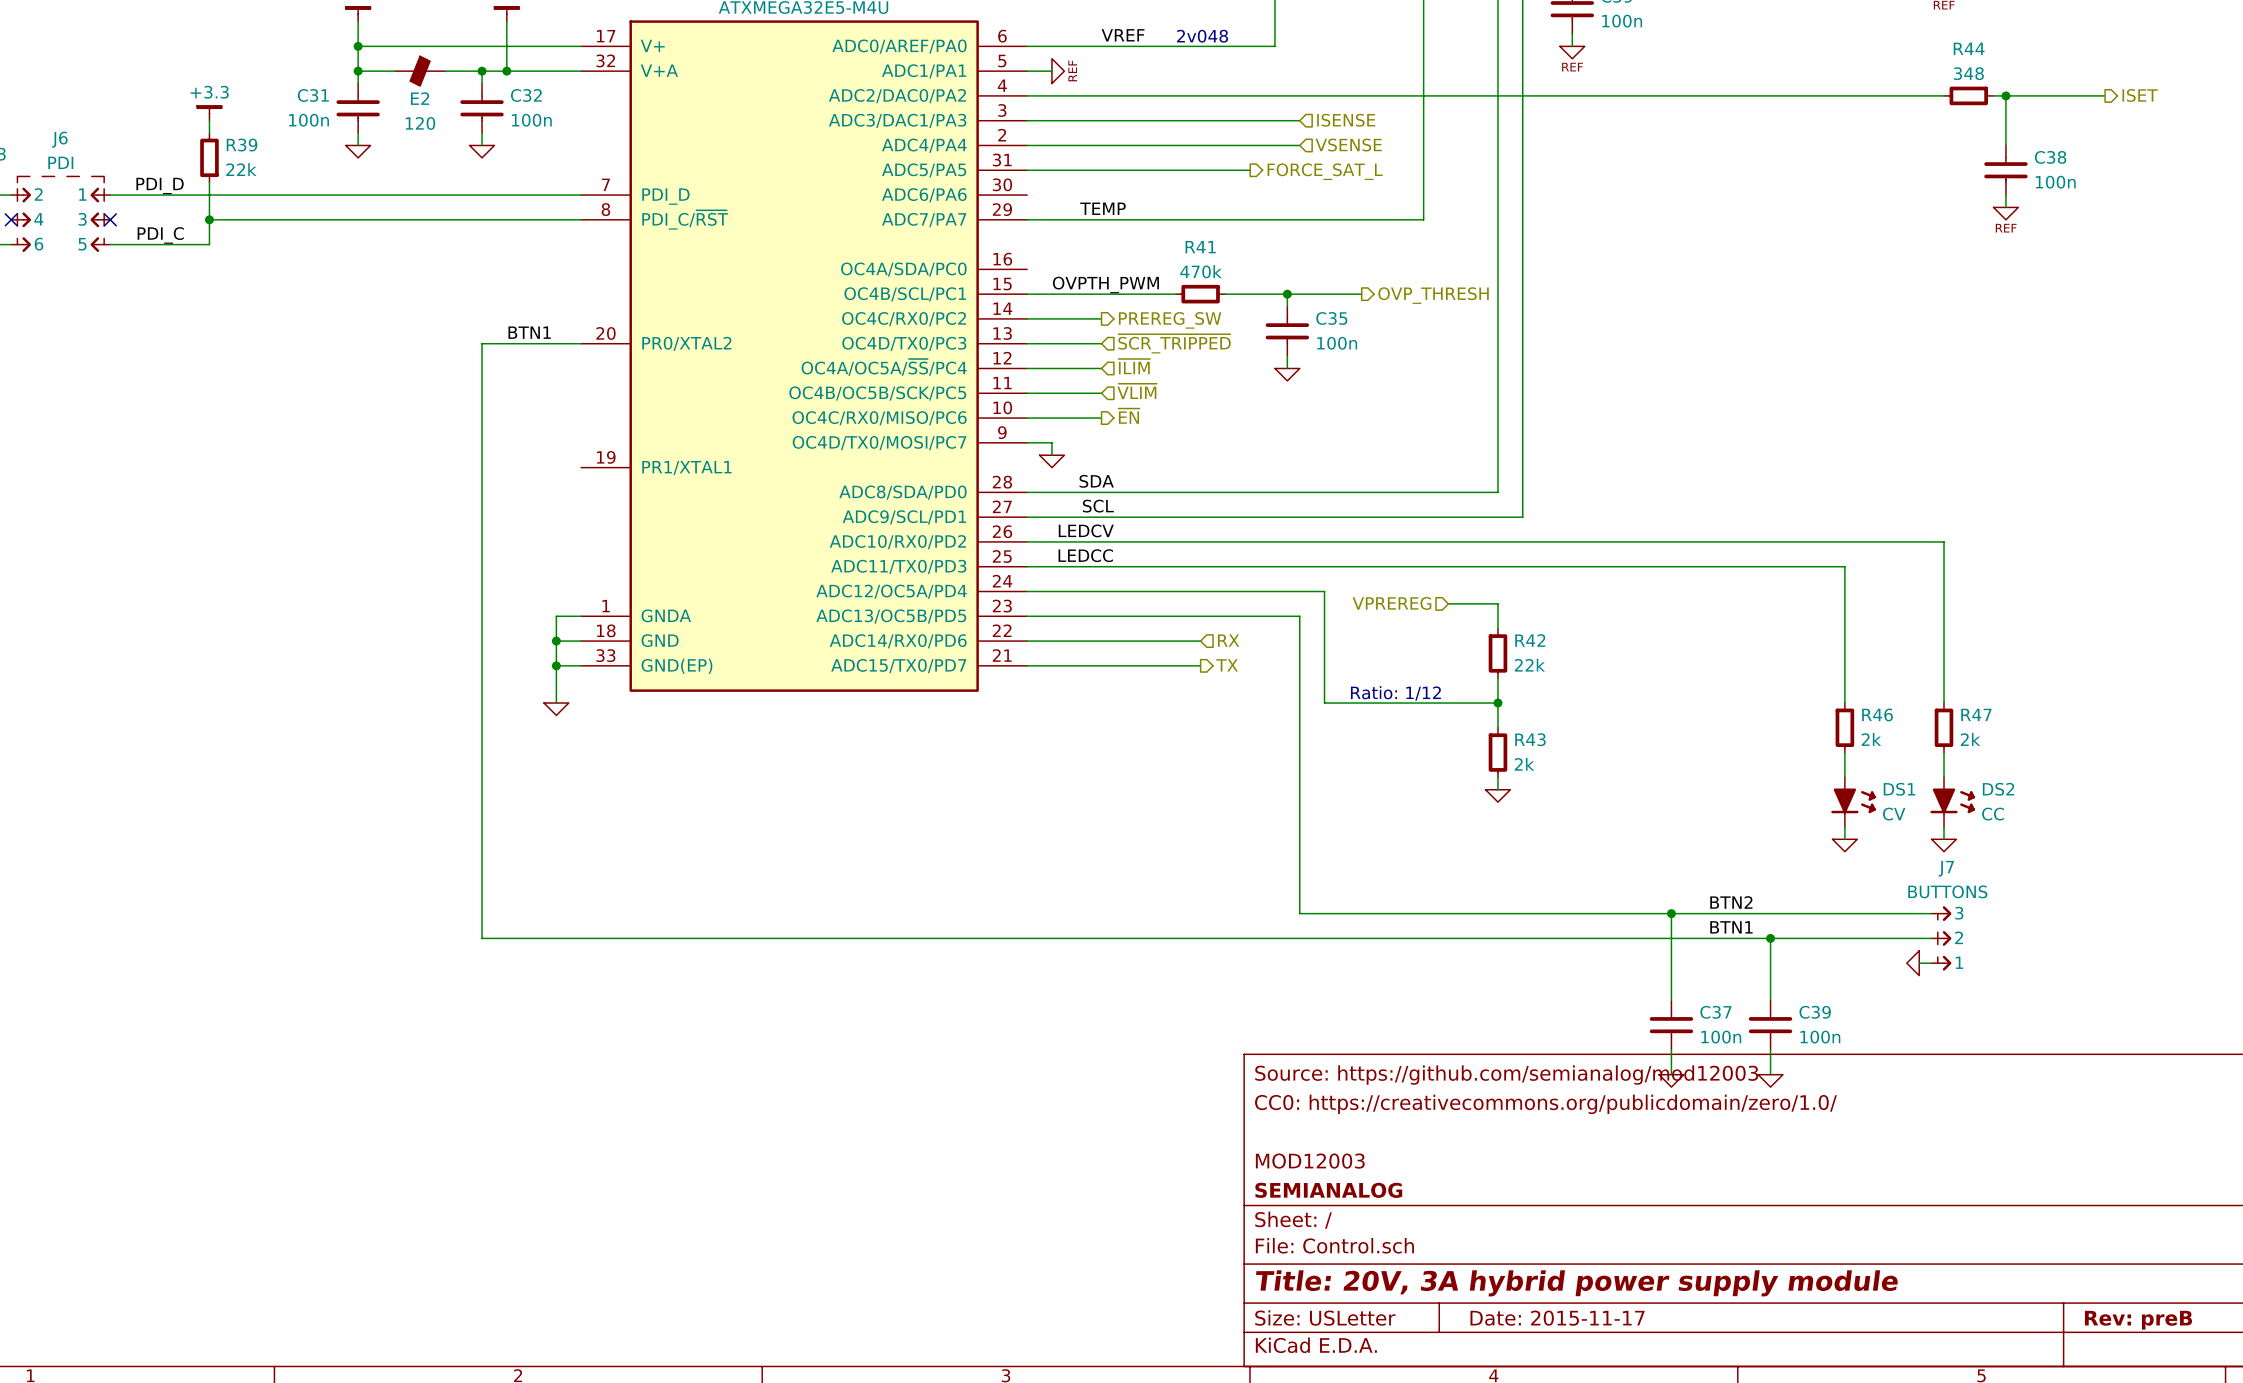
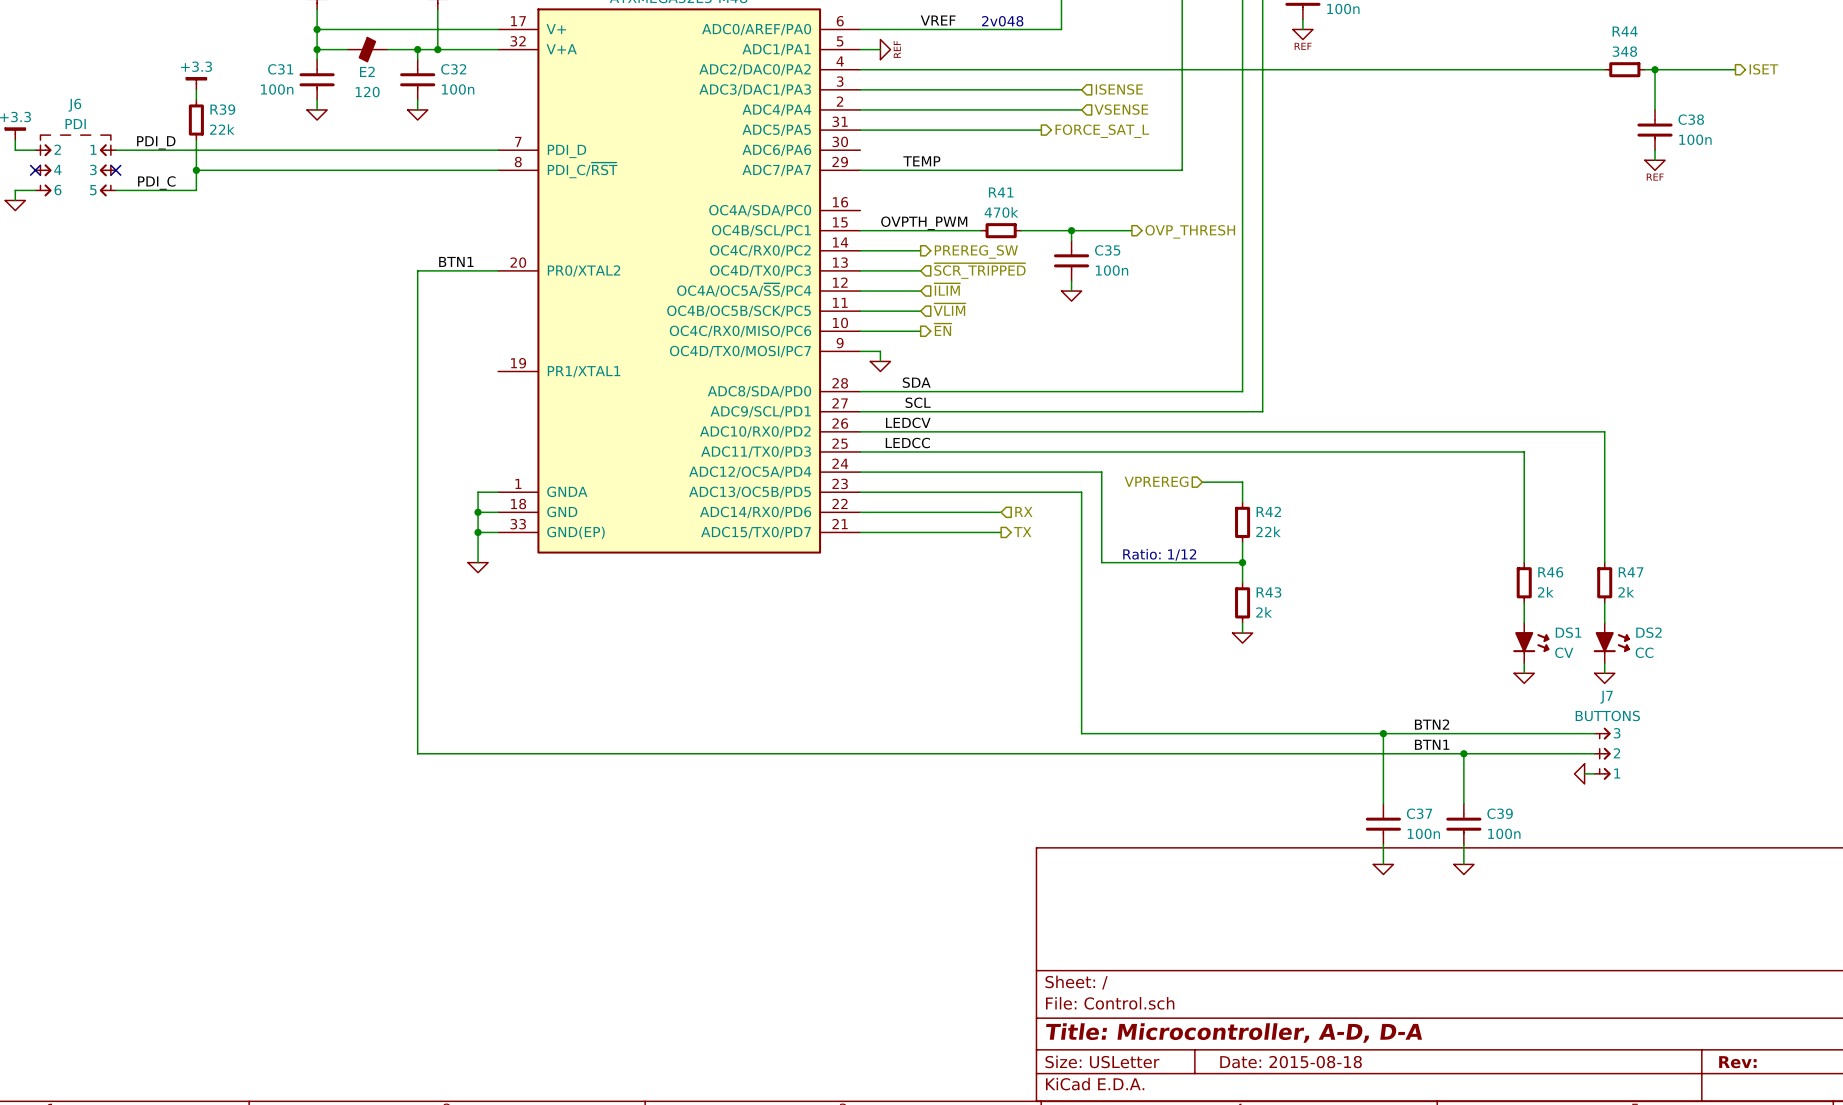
title block: Source: https://github.com/semianalog/mod12003 (1506, 1075) -> none
title block: CC0: https://creativecommons.org/publicdomain/zero/1.0/ (1545, 1104) -> none
title block: MOD12003 (1310, 1161) -> none
title block: SEMIANALOG (1328, 1190) -> none
title block: Title: 20V, 3A hybrid power supply module (1577, 1283) -> Title: Microcontroller, A-D, D-A (1234, 1033)
title block: Date: 2015-11-17 (1557, 1318) -> Date: 2015-08-18 (1291, 1062)
title block: Rev: preB (2138, 1320) -> Rev: (1737, 1062)

